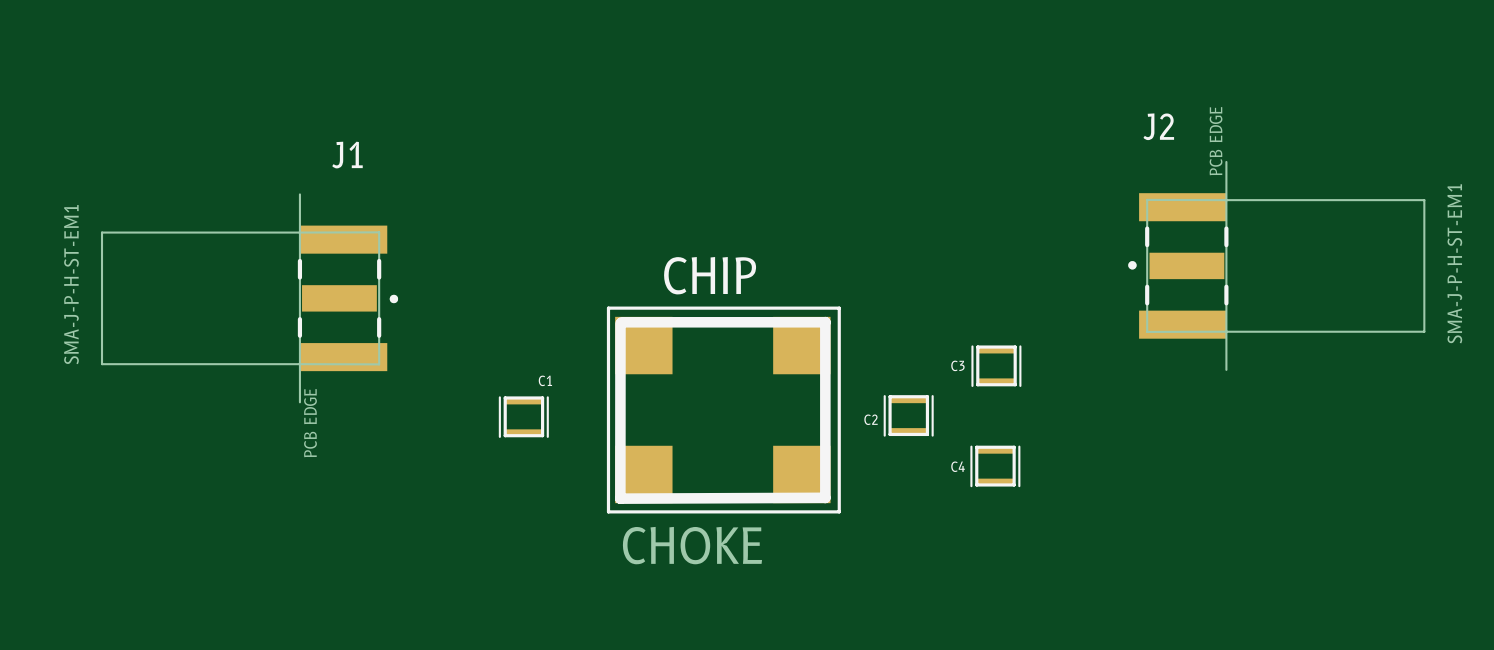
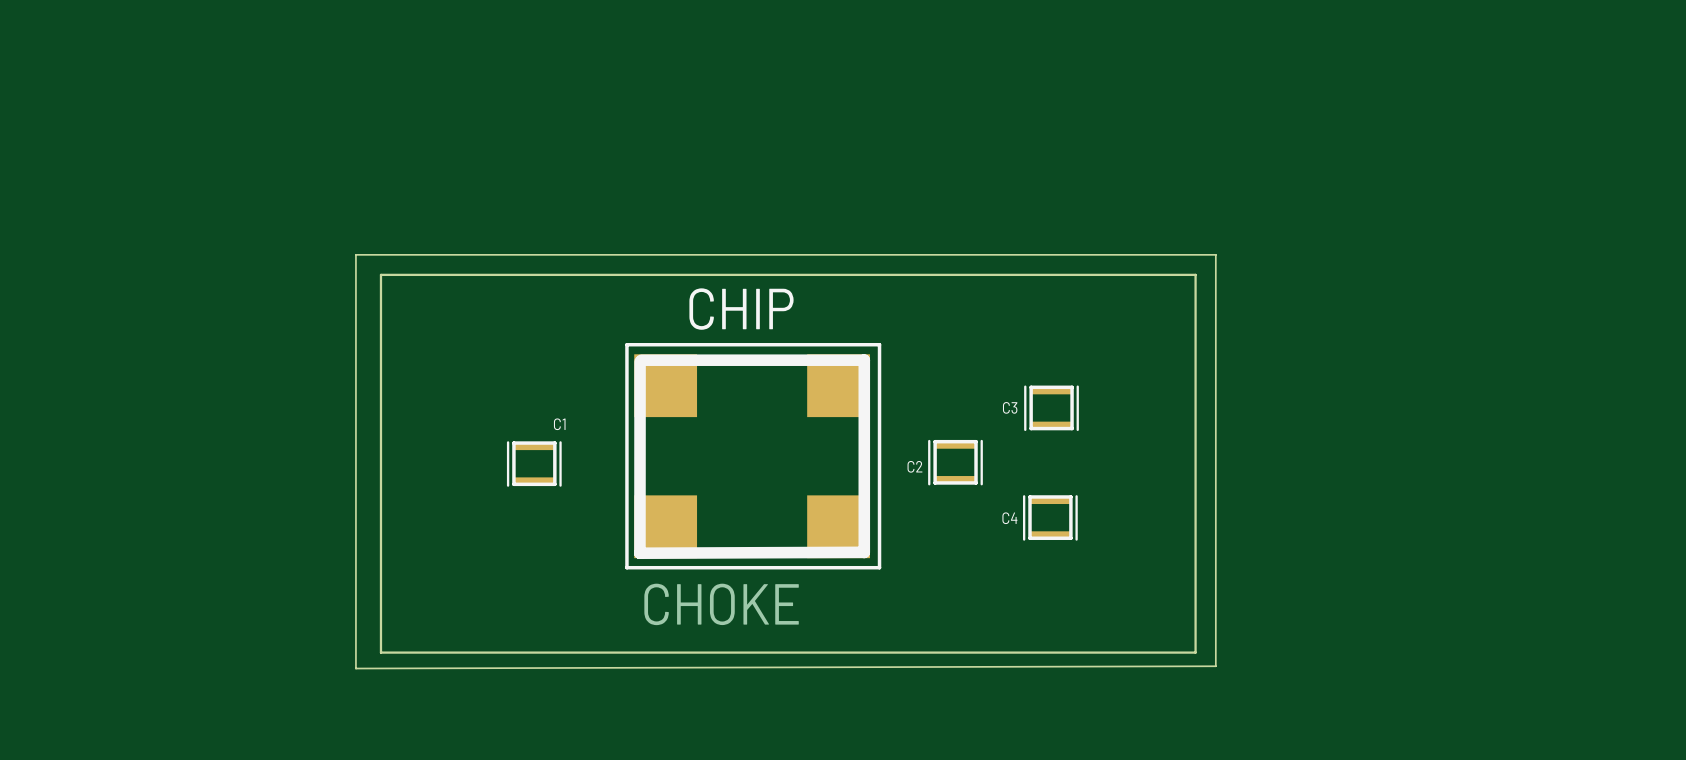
board edge: none -> (355, 254) (1215, 254) (1215, 666) (355, 668) (355, 254)
board edge: none -> (380, 274) (1195, 274) (1195, 652) (380, 652) (380, 274)
J2: SMA-J-P-H-ST-EM1 (1276, 265) -> none
J1: SMA-J-P-H-ST-EM1 (249, 298) -> none

